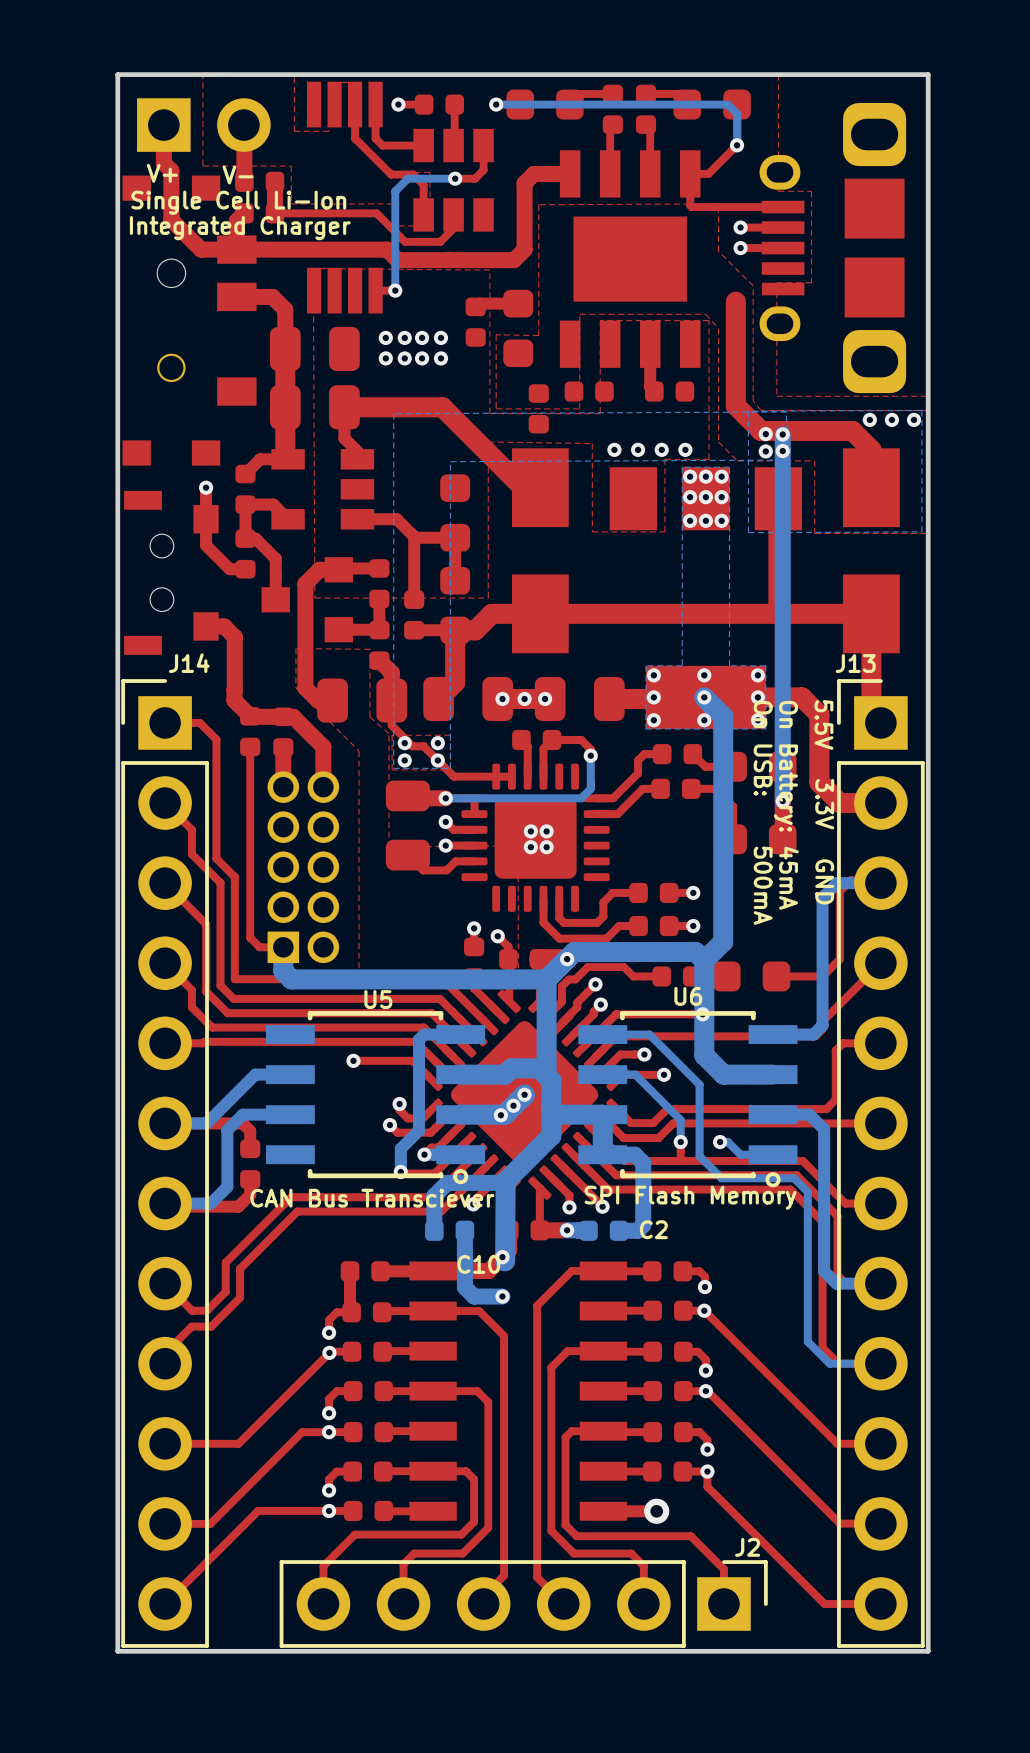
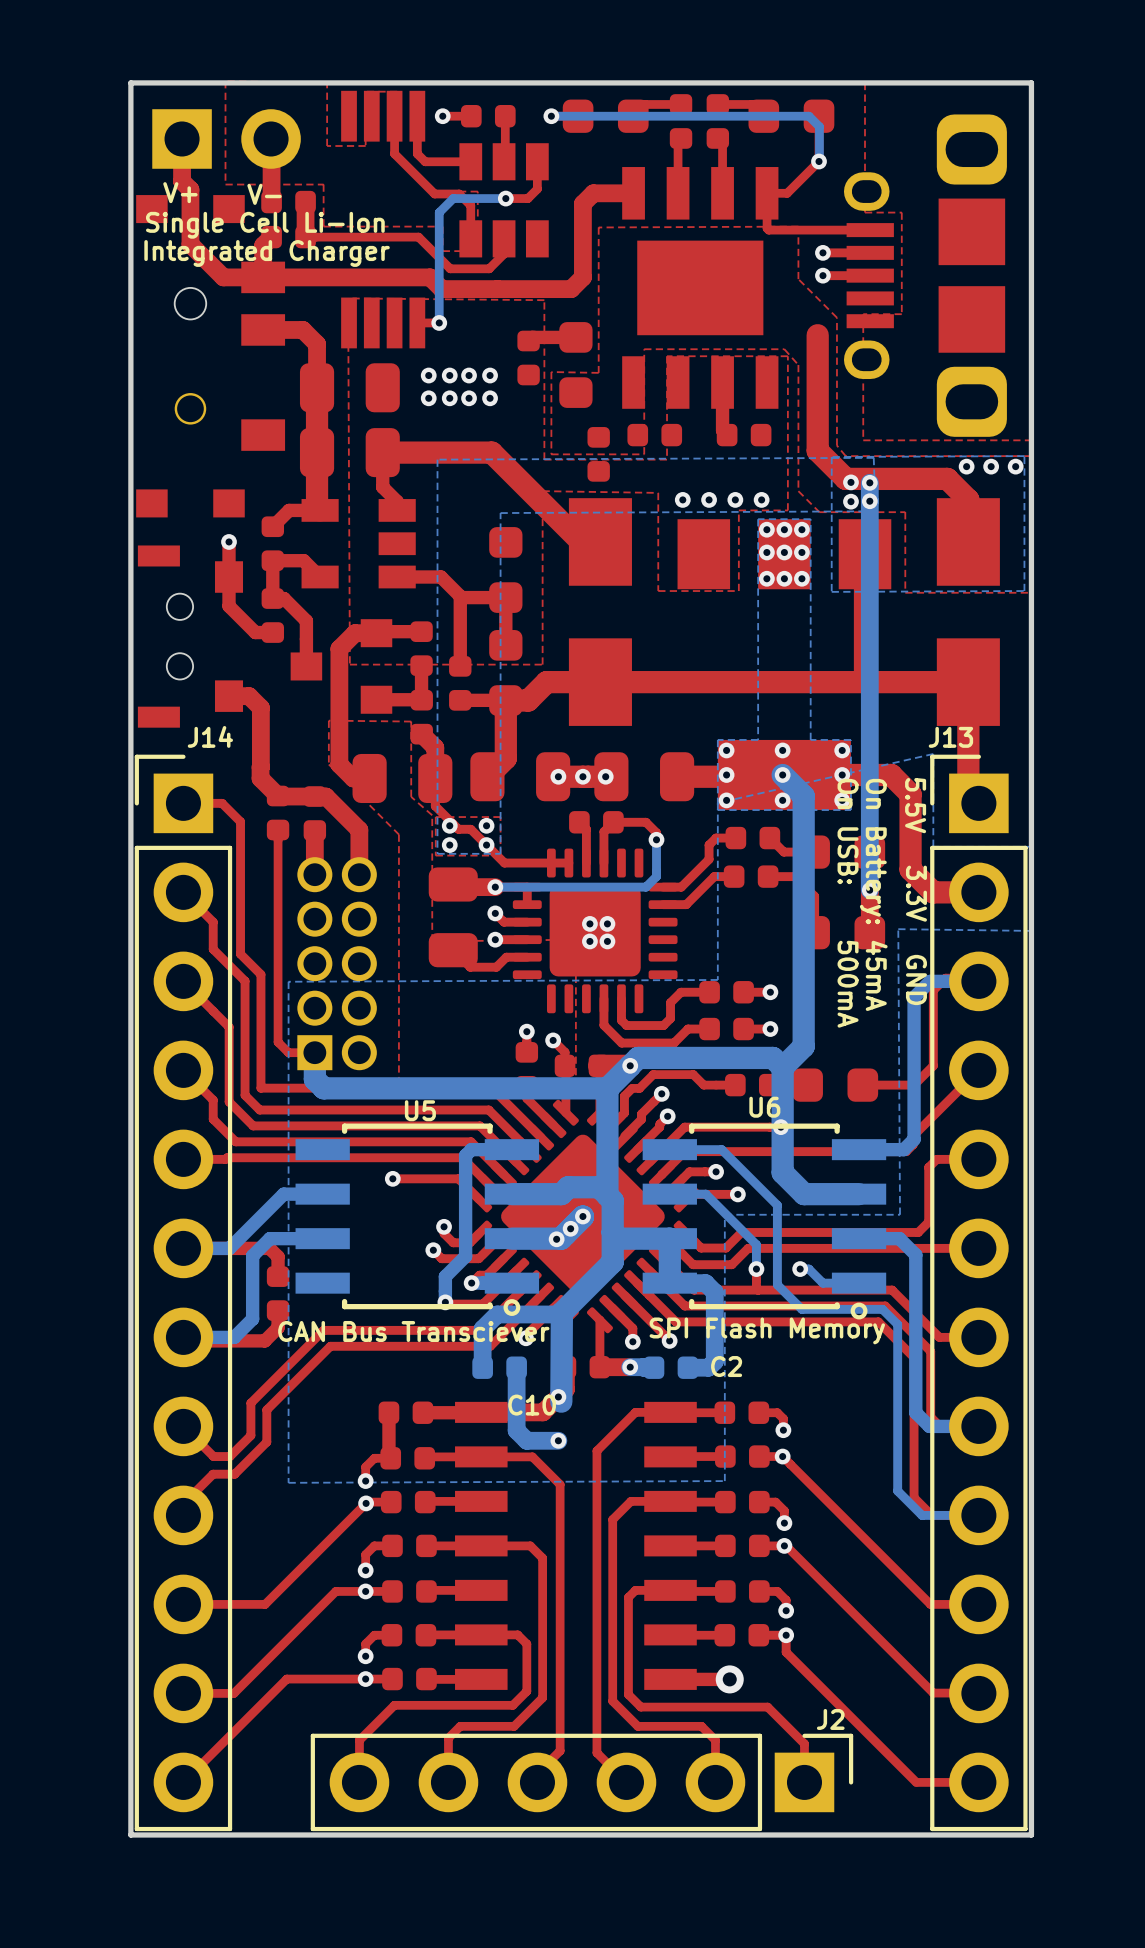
bottom zone outline: none -> (717, 803) (933, 753) (933, 846) (1031, 846) (1031, 930) (898, 929) (900, 1214) (724, 1214) (724, 1481) (288, 1482) (288, 981) (717, 979) (717, 810)

